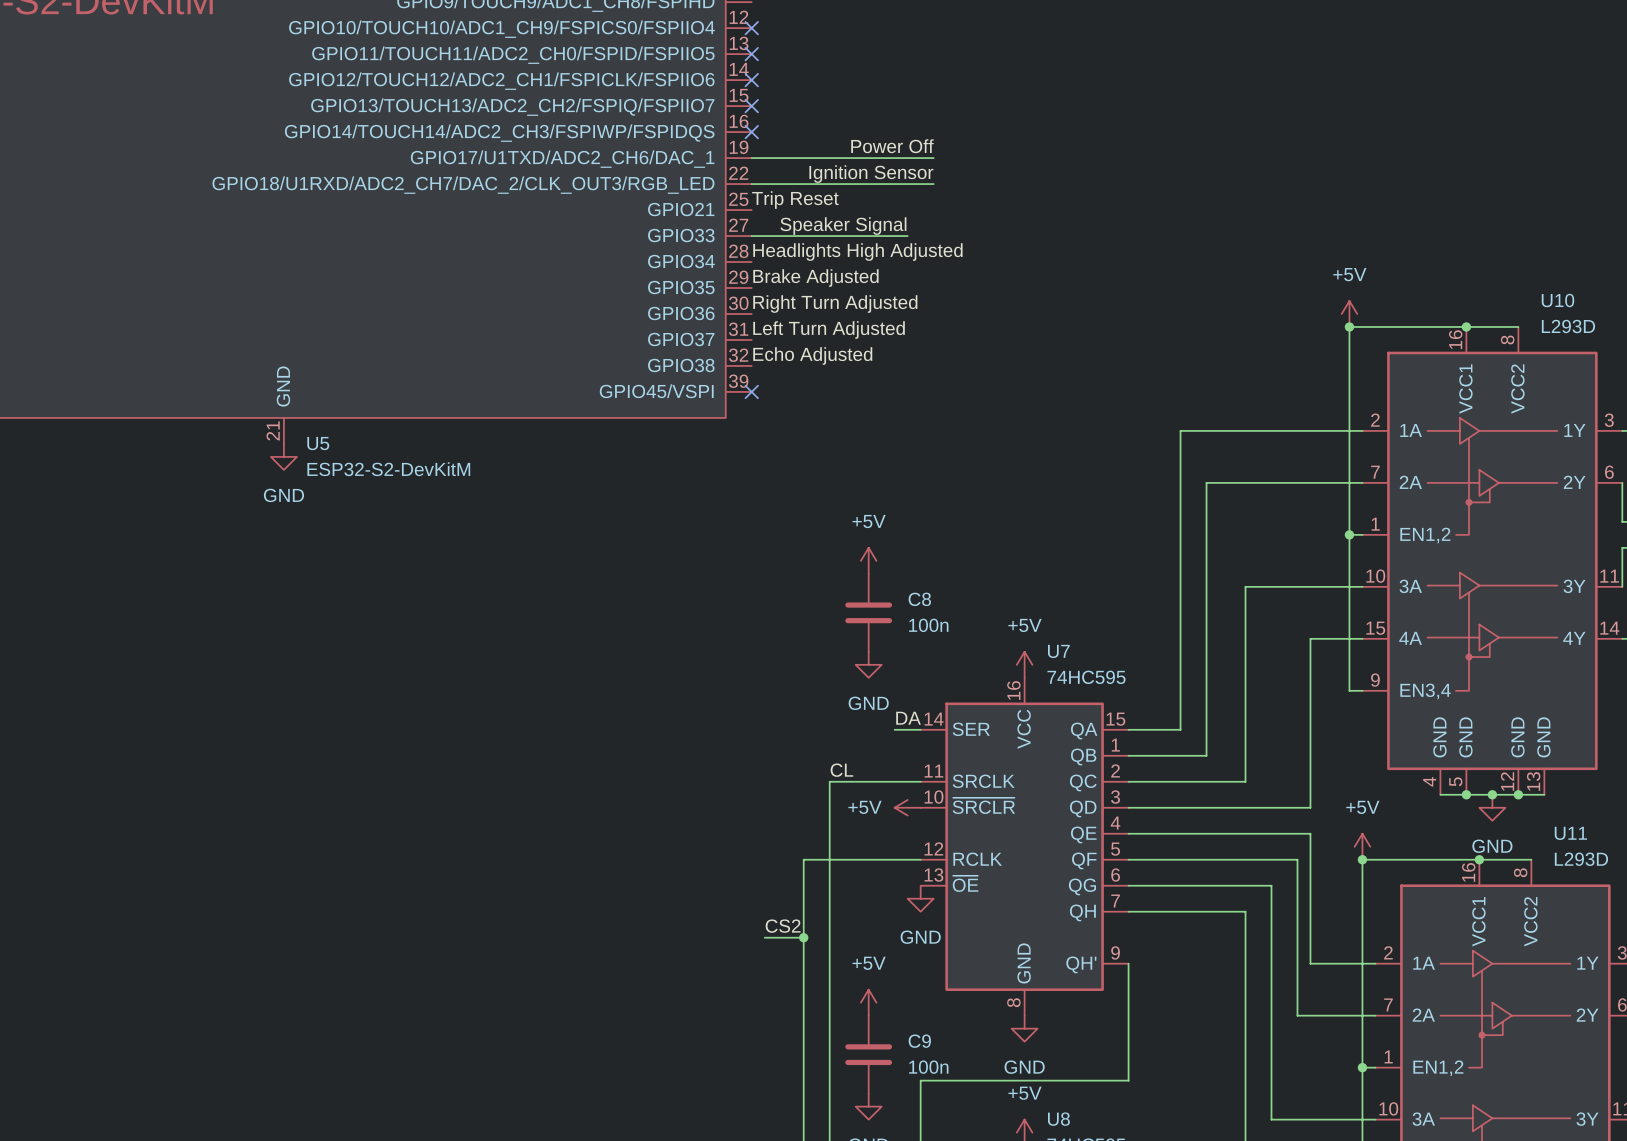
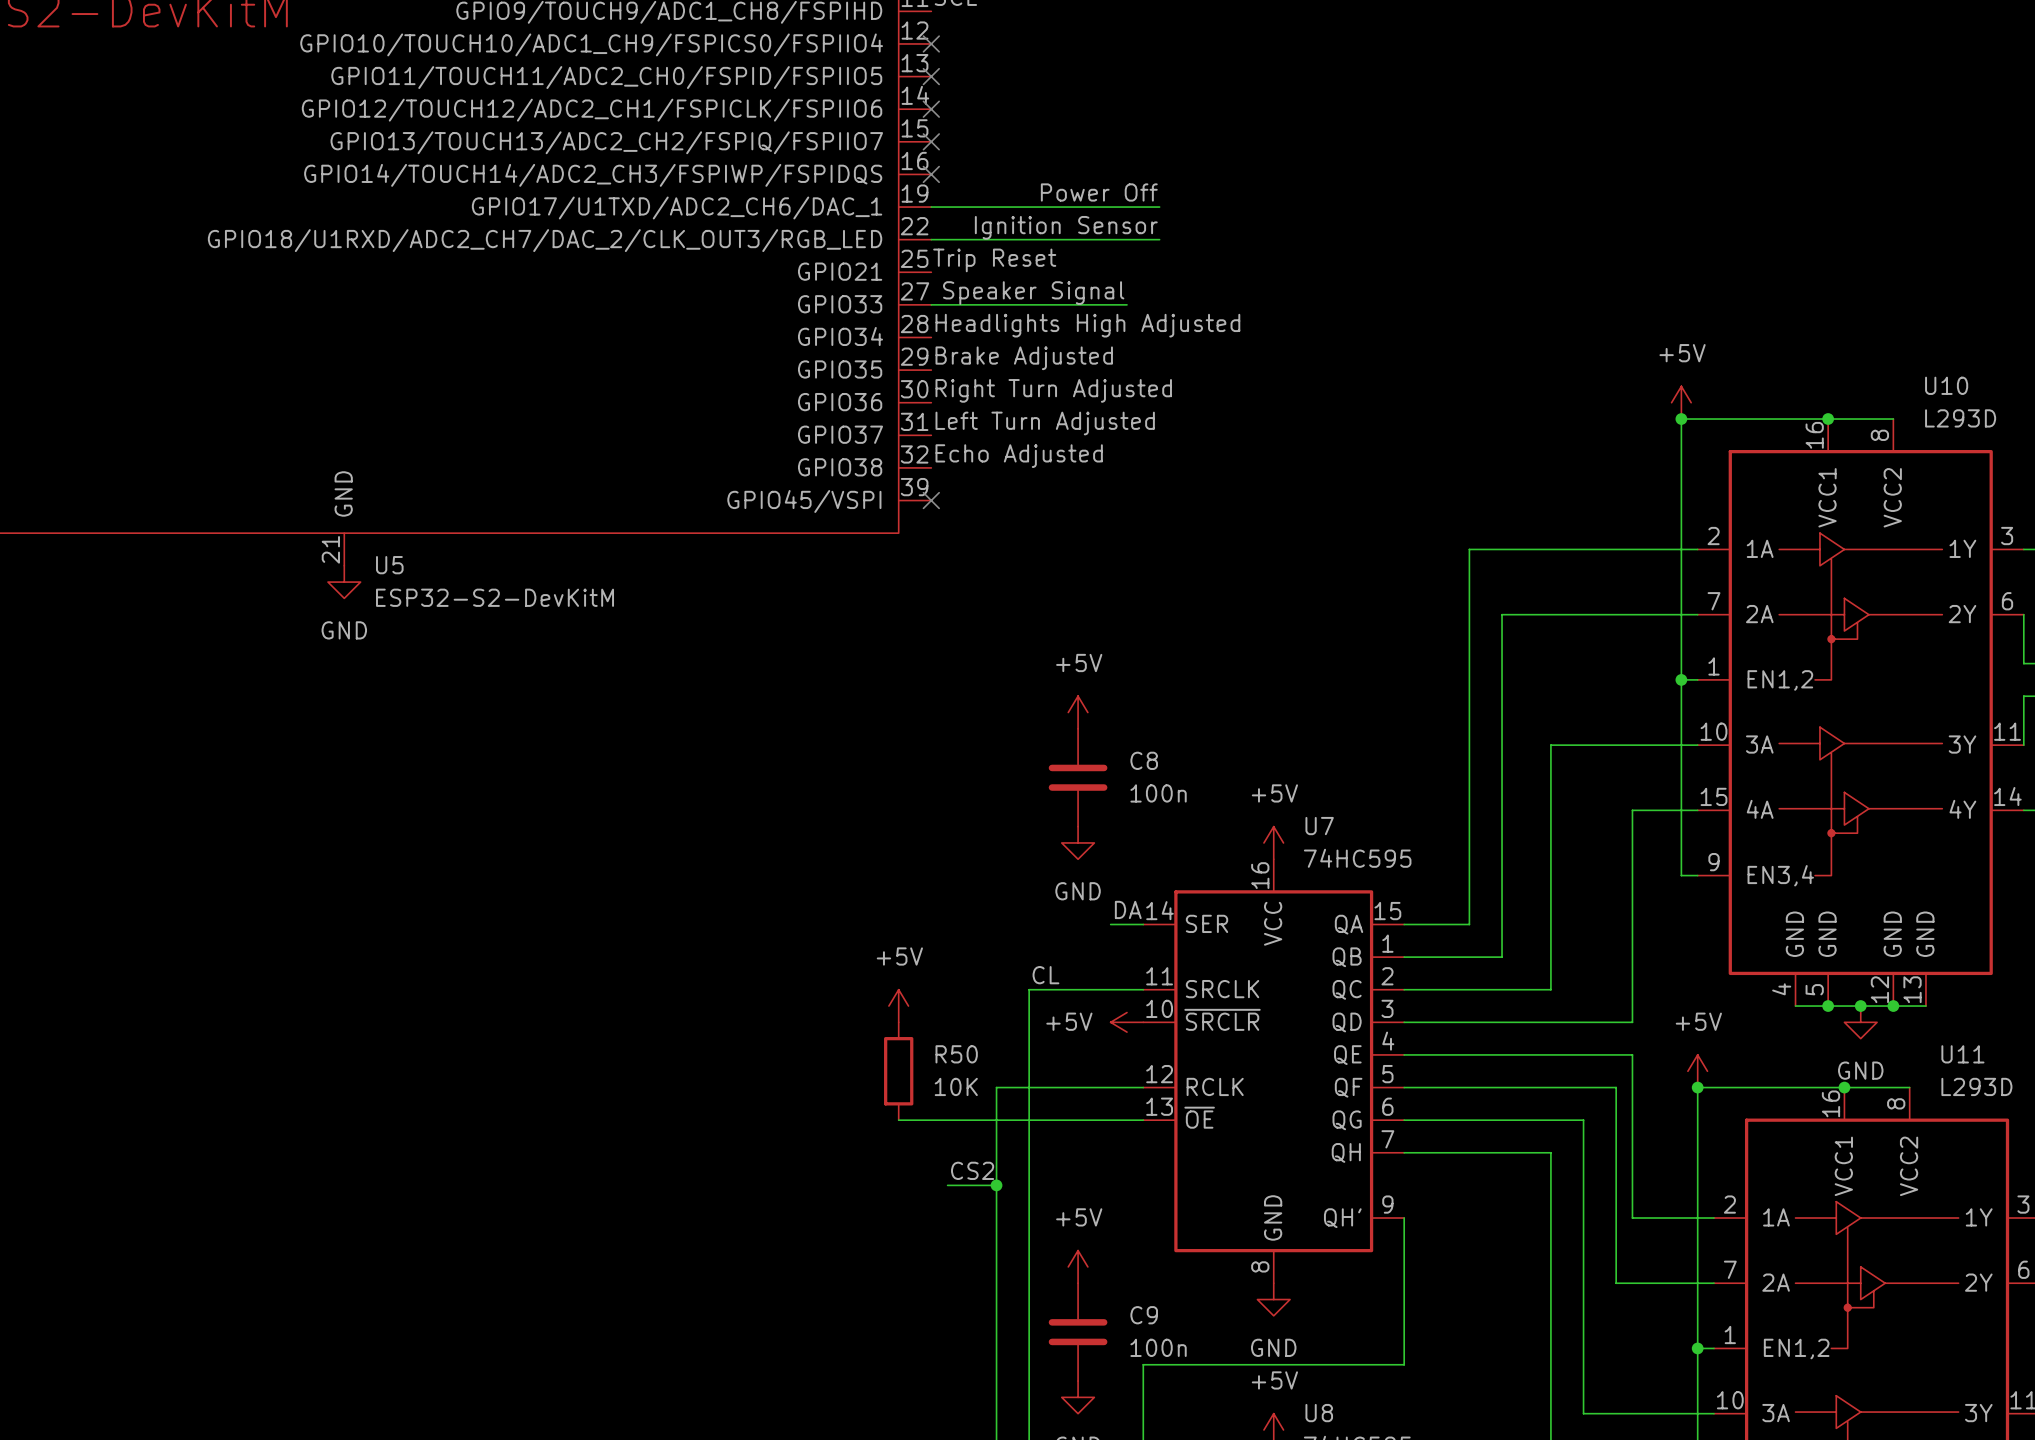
power symbol: none -> +5V (898, 1006)
R50: none -> 10K (898, 1071)
wire: none -> (898, 1120) (1143, 1120)
power symbol: GND (920, 898) -> none

